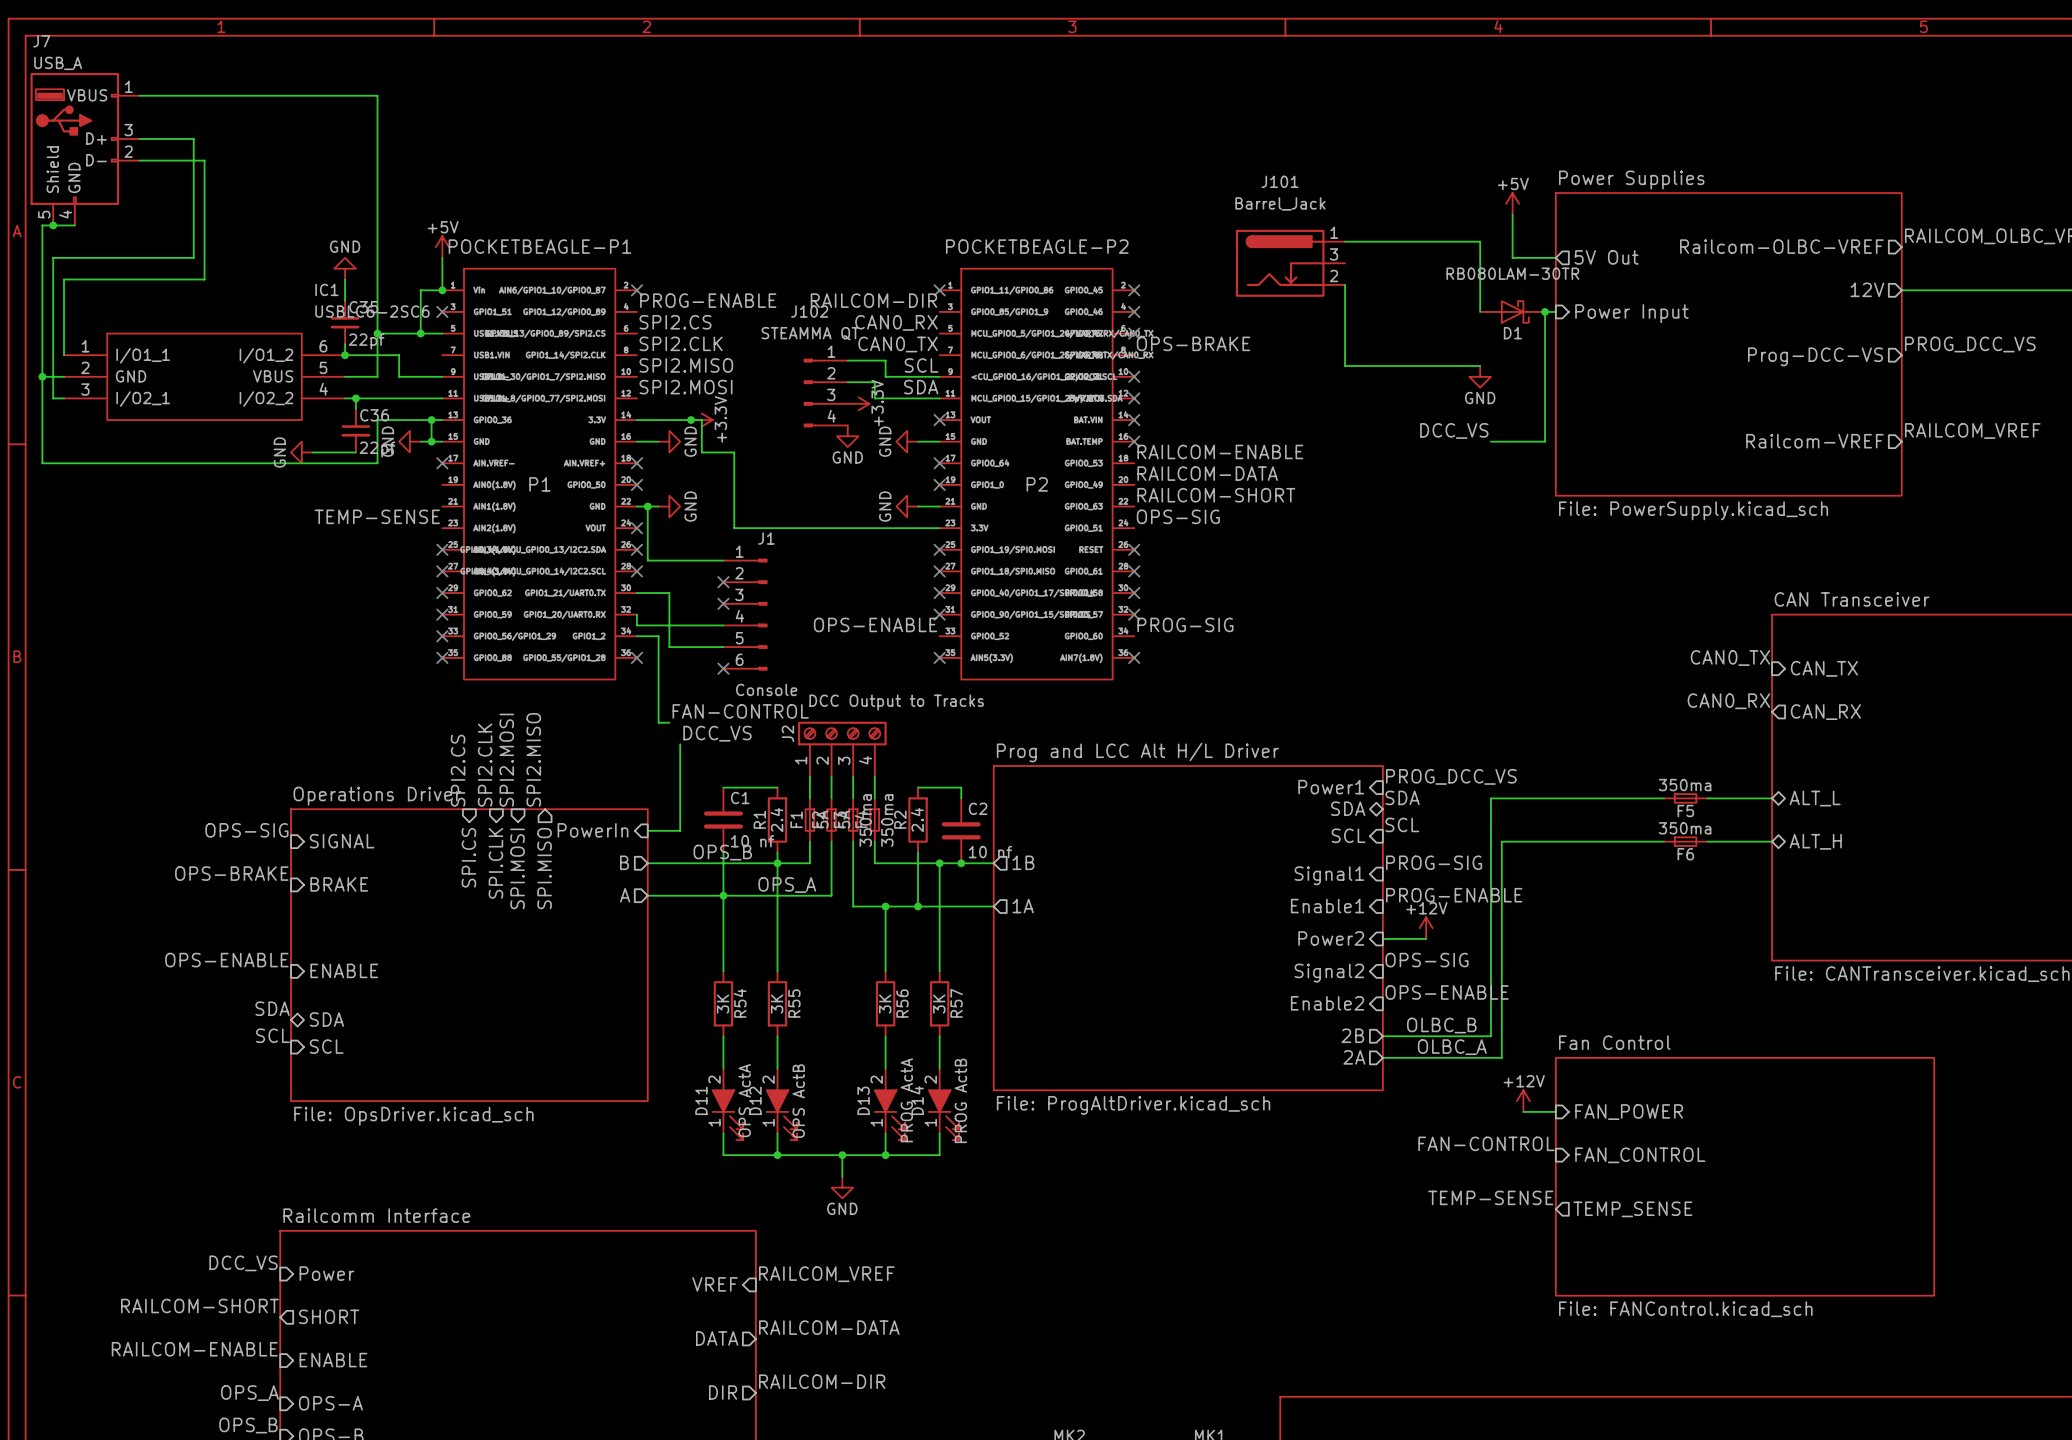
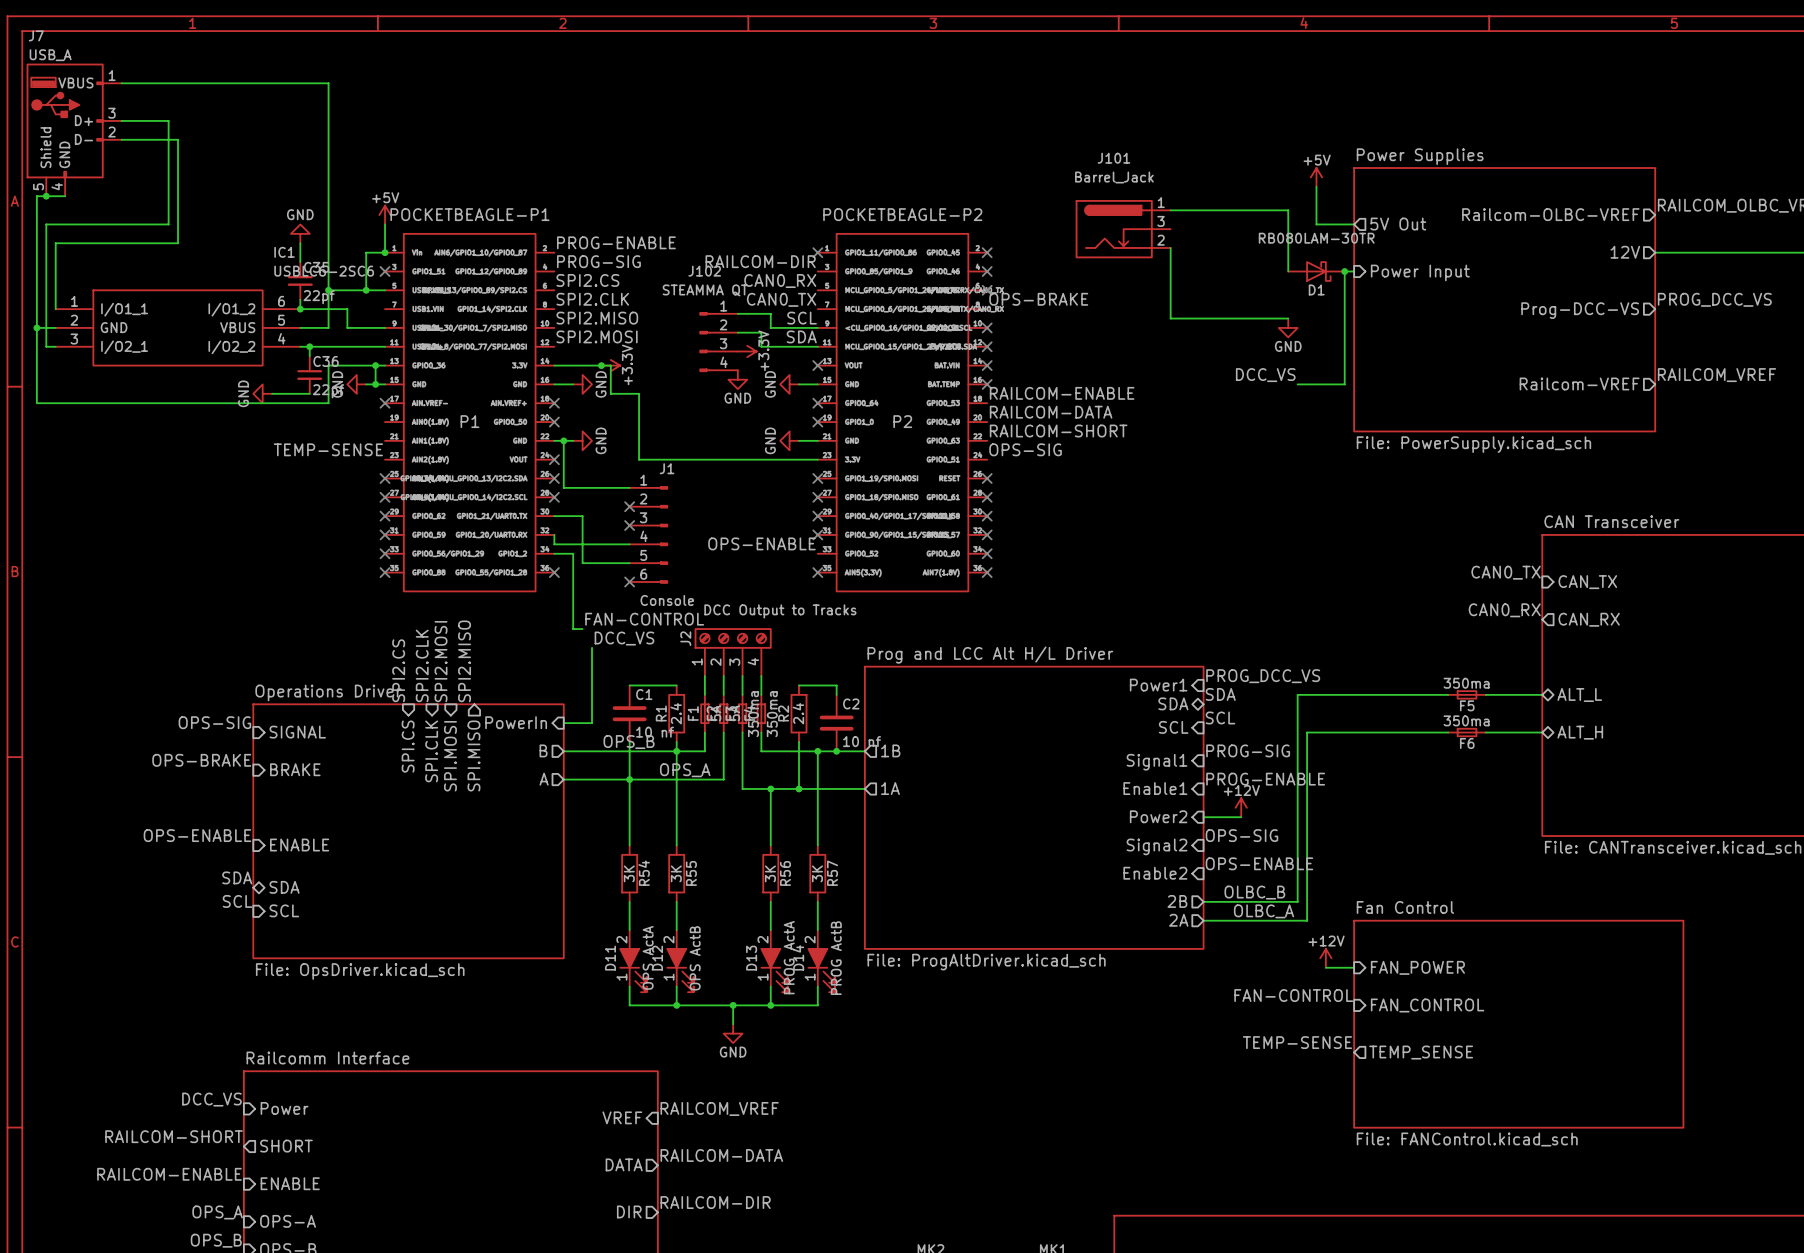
label: none -> PROG-ENABLE (616, 242)
no-connect mark: (636, 290) -> none
label: PROG-ENABLE (708, 300) -> PROG-SIG (598, 261)
label: PROG-SIG (1185, 624) -> none
no-connect mark: none -> (987, 553)

